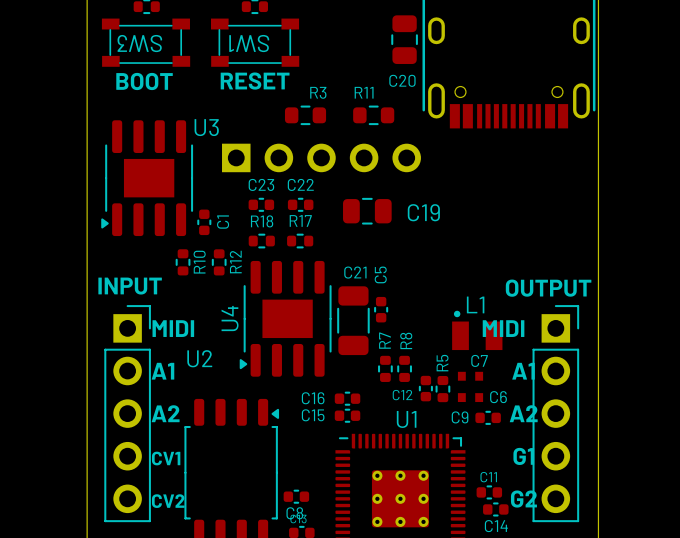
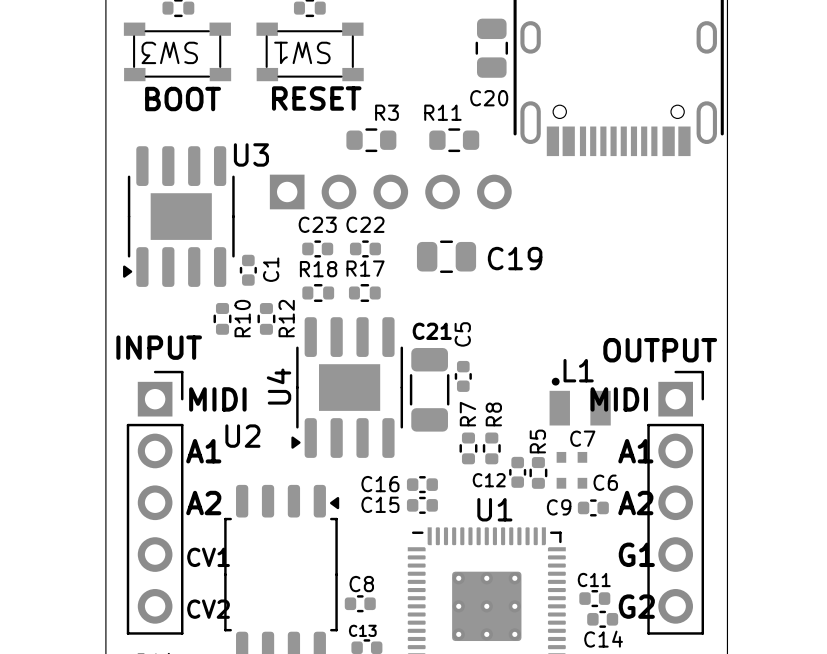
C8 name position: C8 (294, 513) -> C8 (361, 584)

